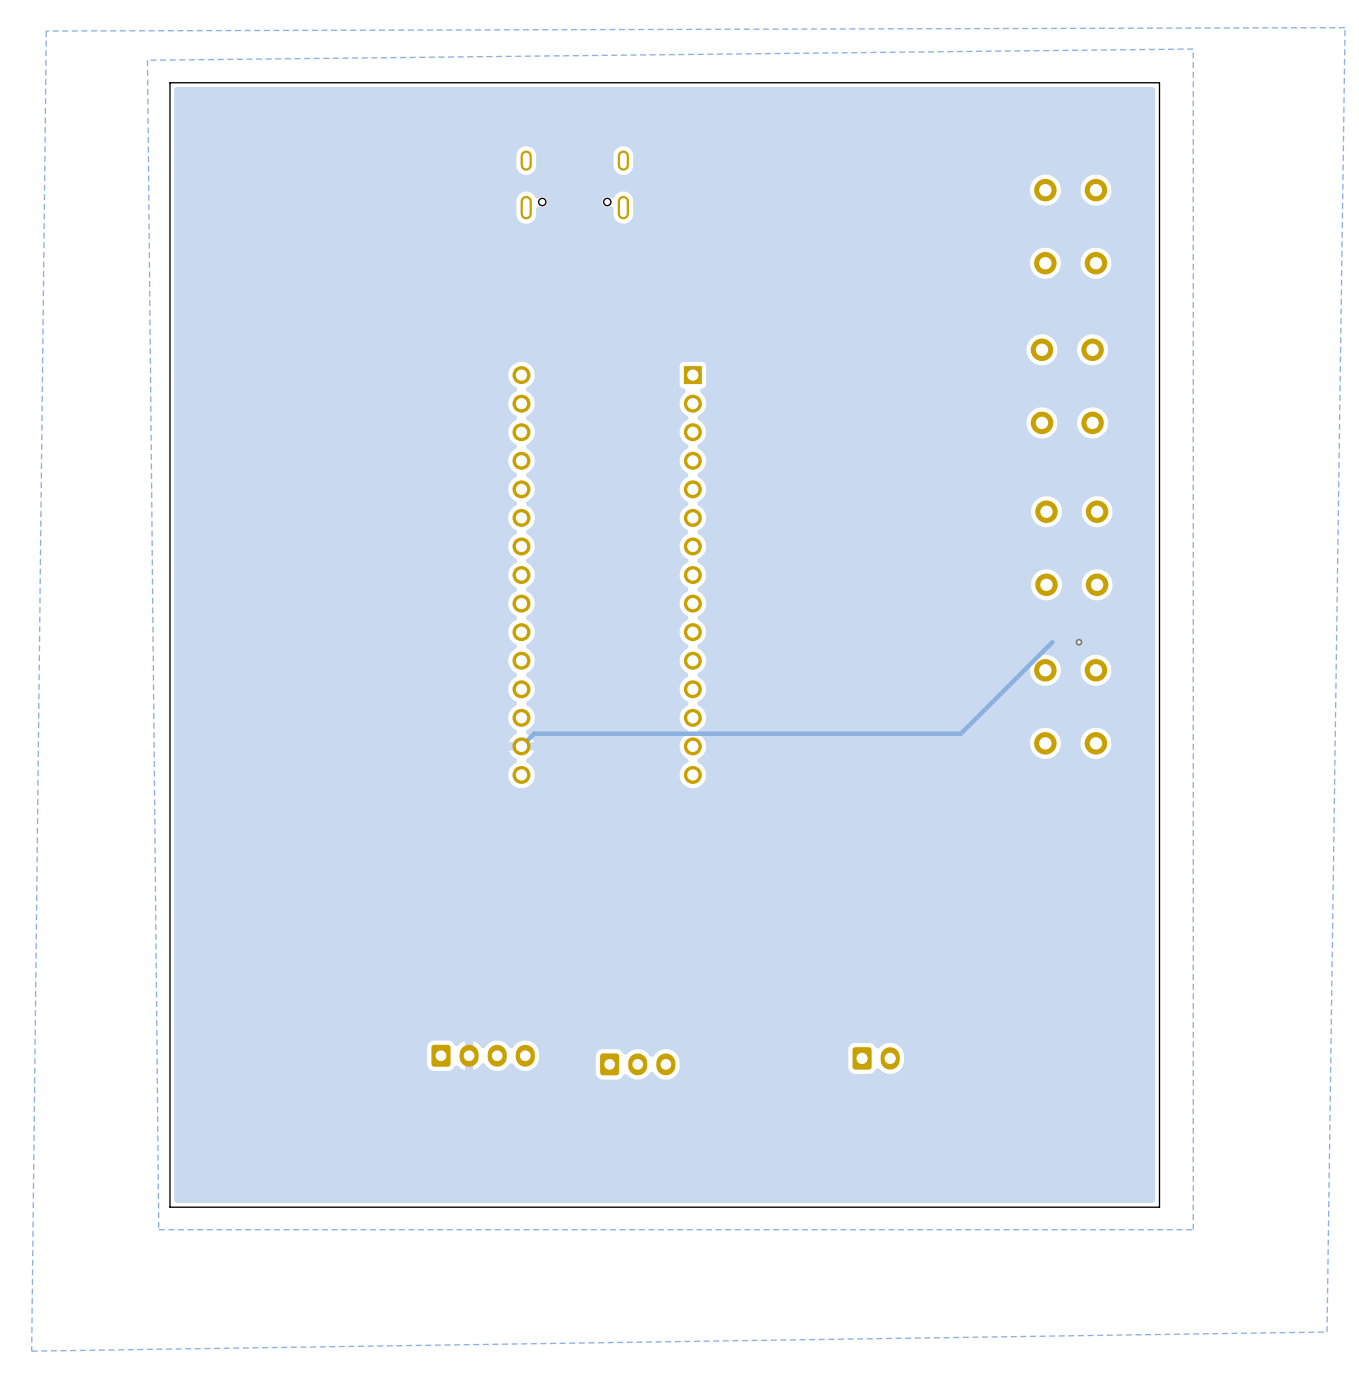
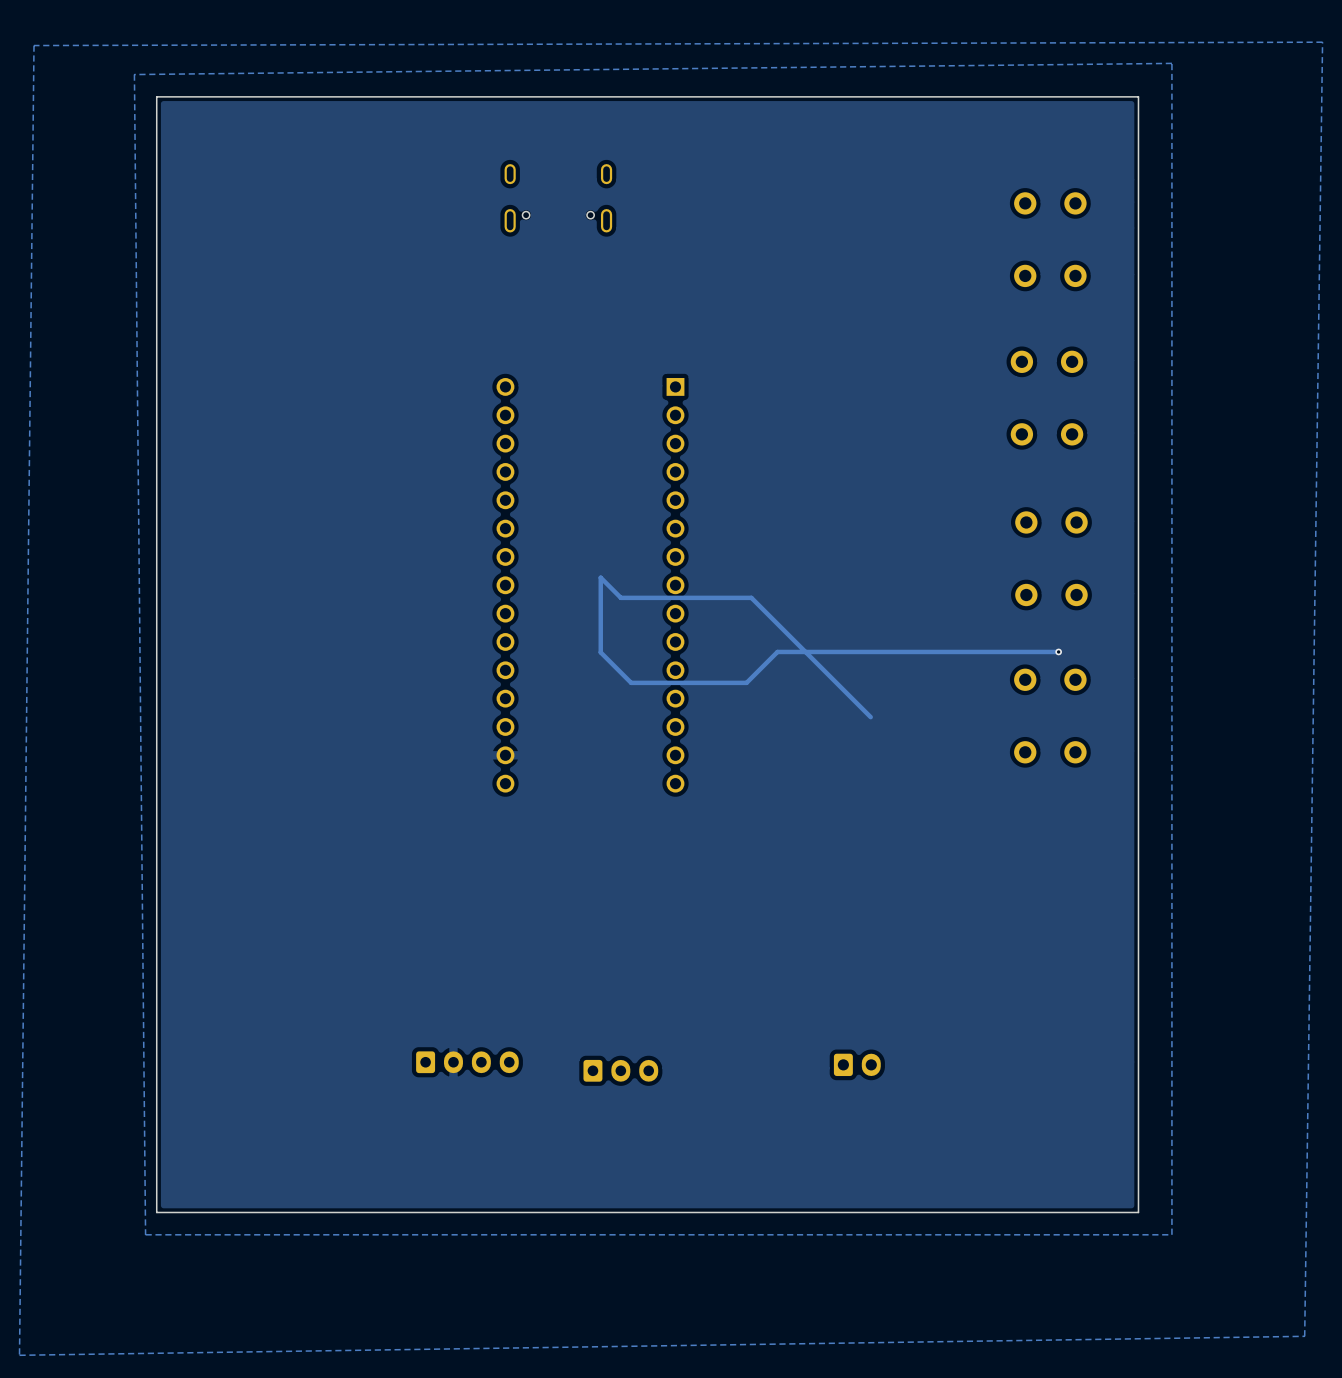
track: (1052, 642) (960, 733) (534, 733) (521, 746) -> none
track: none -> (1058, 651) (777, 651) (746, 682) (631, 682) (600, 652) (600, 577) (620, 597) (751, 597) (870, 717)

